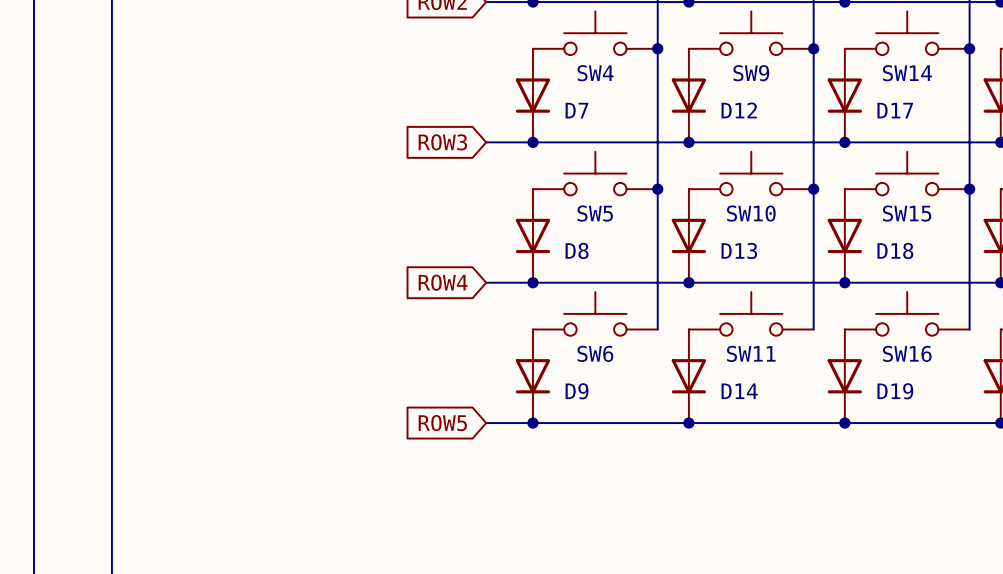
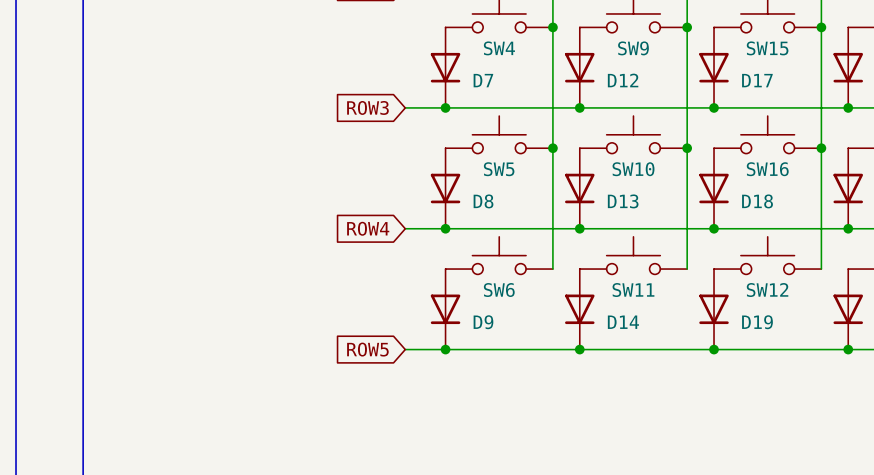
SW14 name: SW14 (907, 73) -> SW15 (767, 48)
SW15 name: SW15 (907, 213) -> SW16 (767, 169)
SW16 name: SW16 (907, 353) -> SW12 (767, 290)

